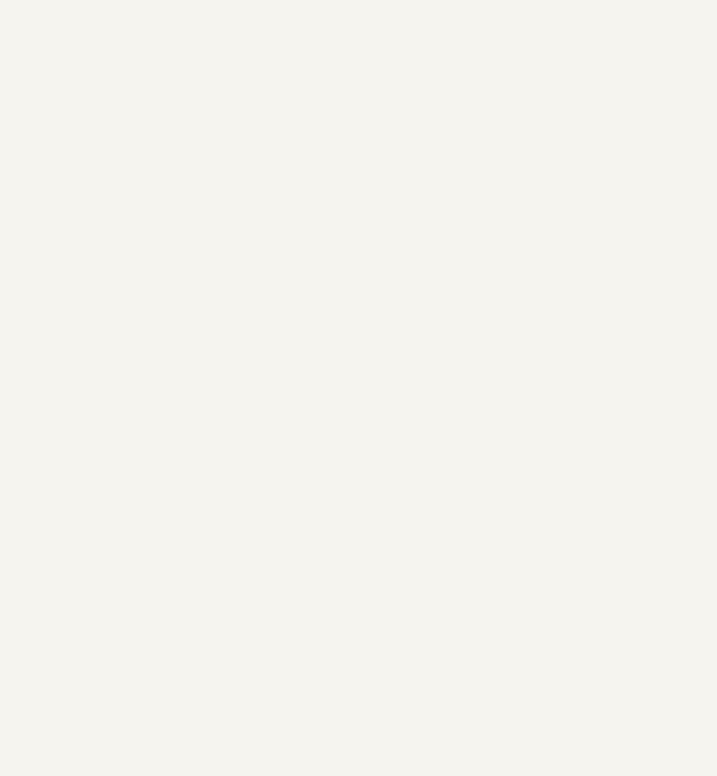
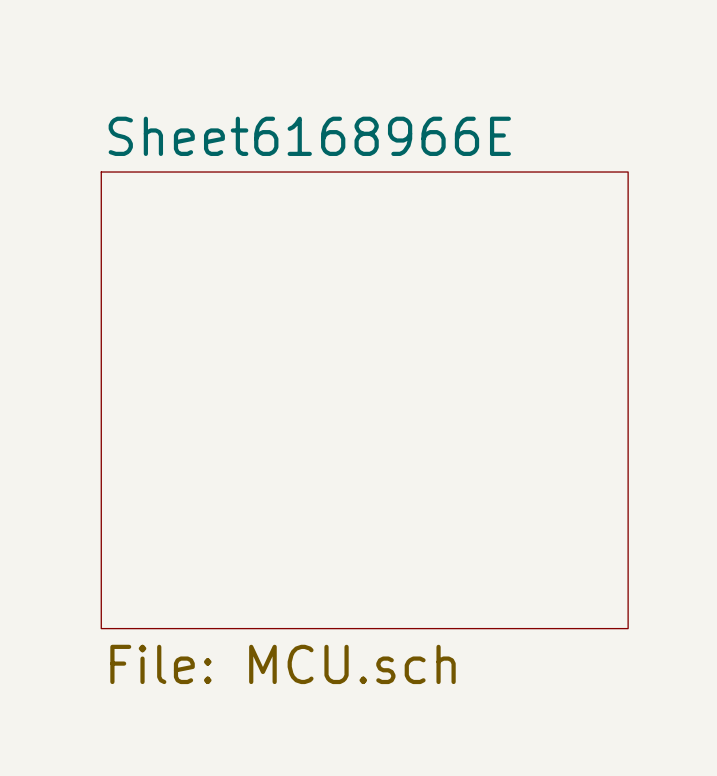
sheet Sheet6168966E: none -> File: MCU.sch (364, 400)

